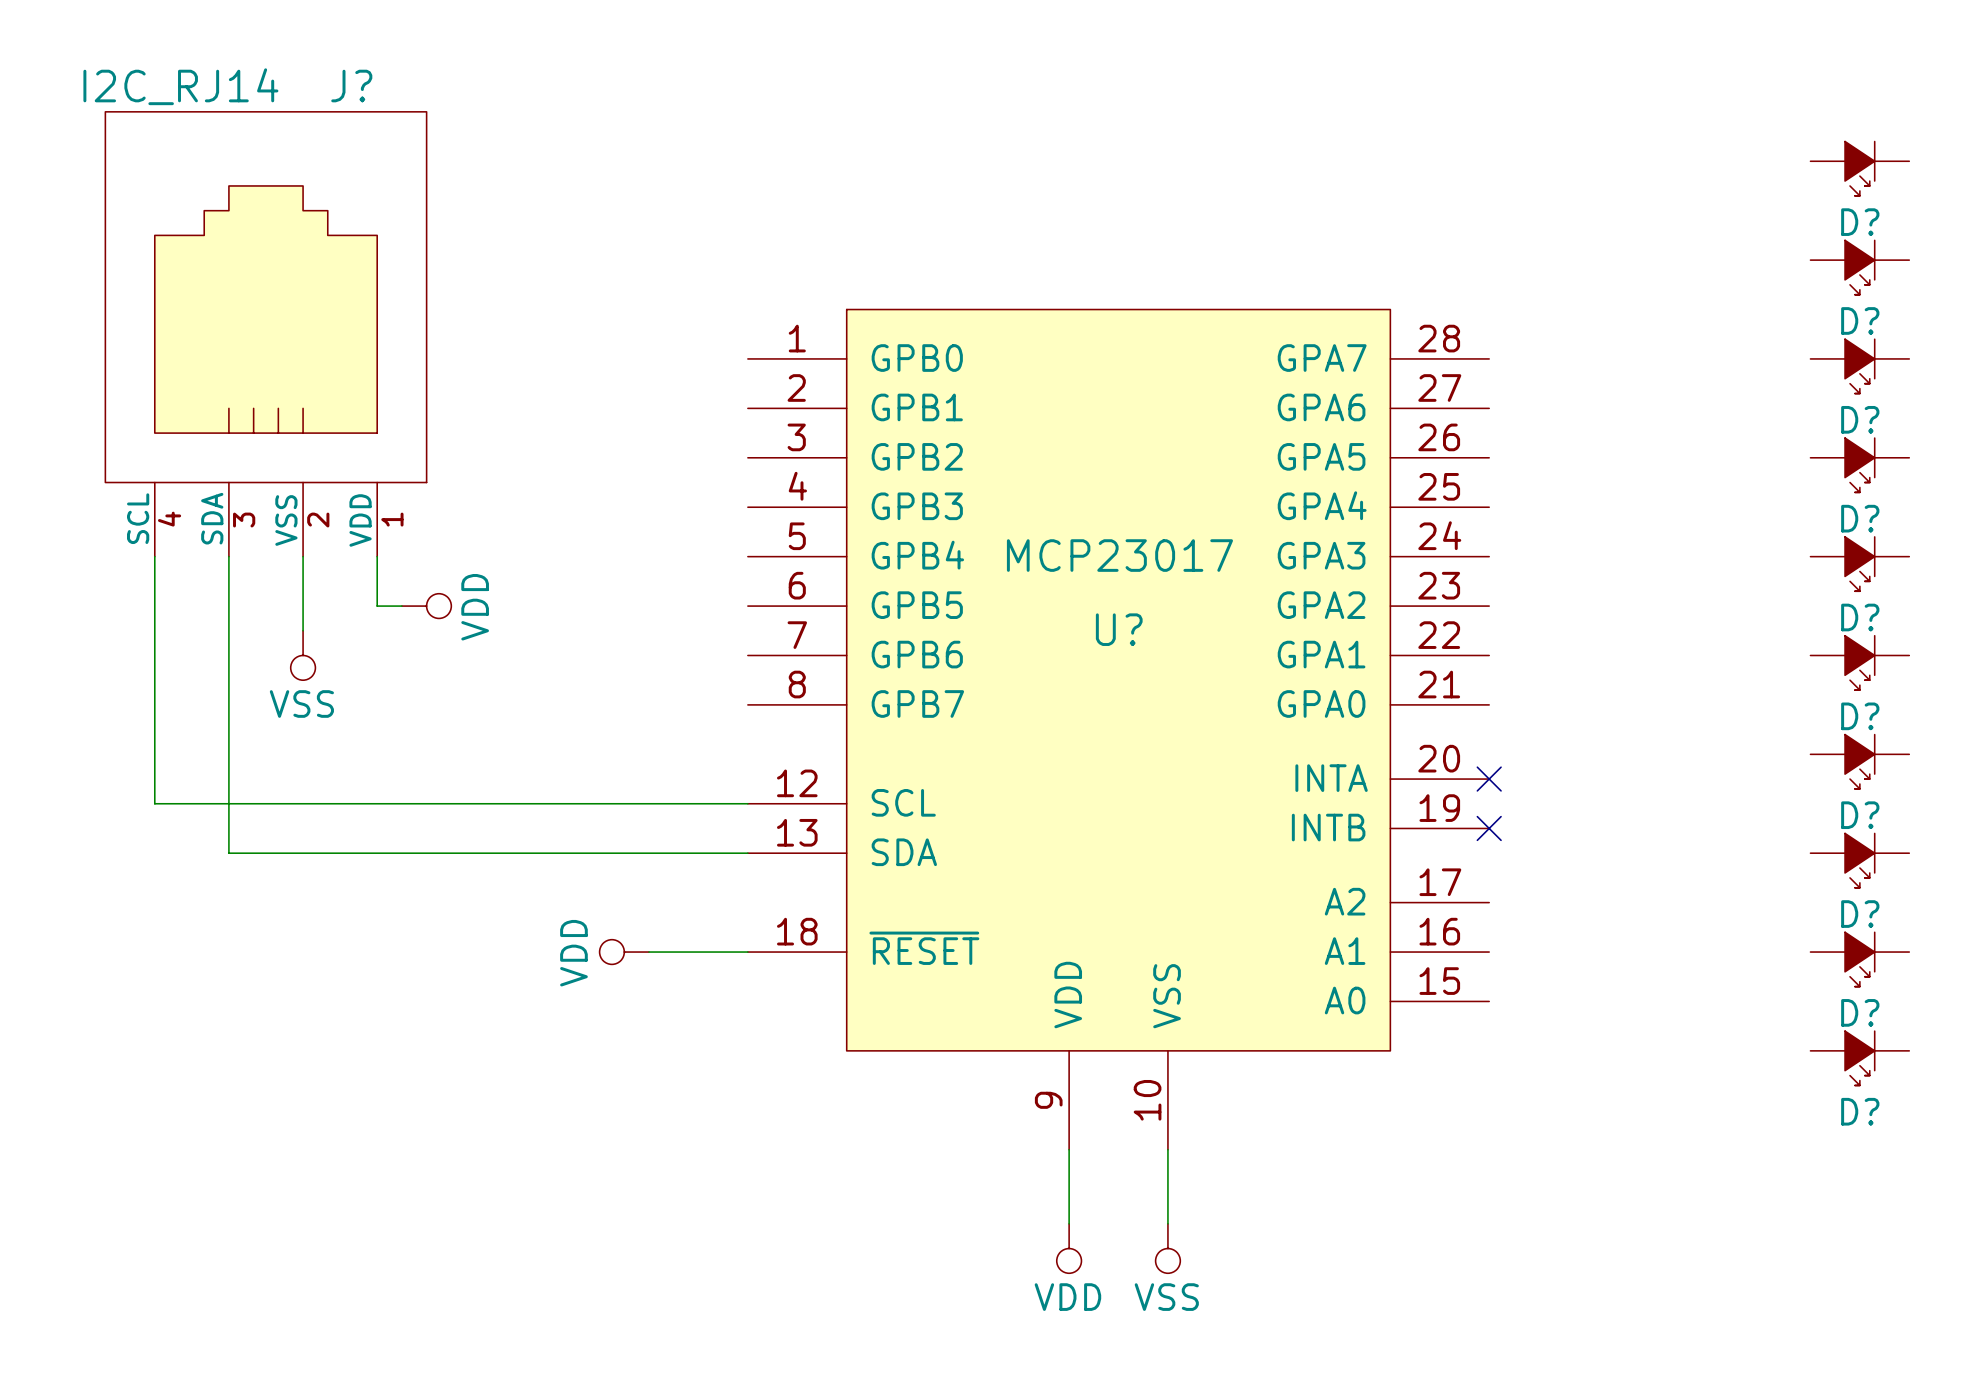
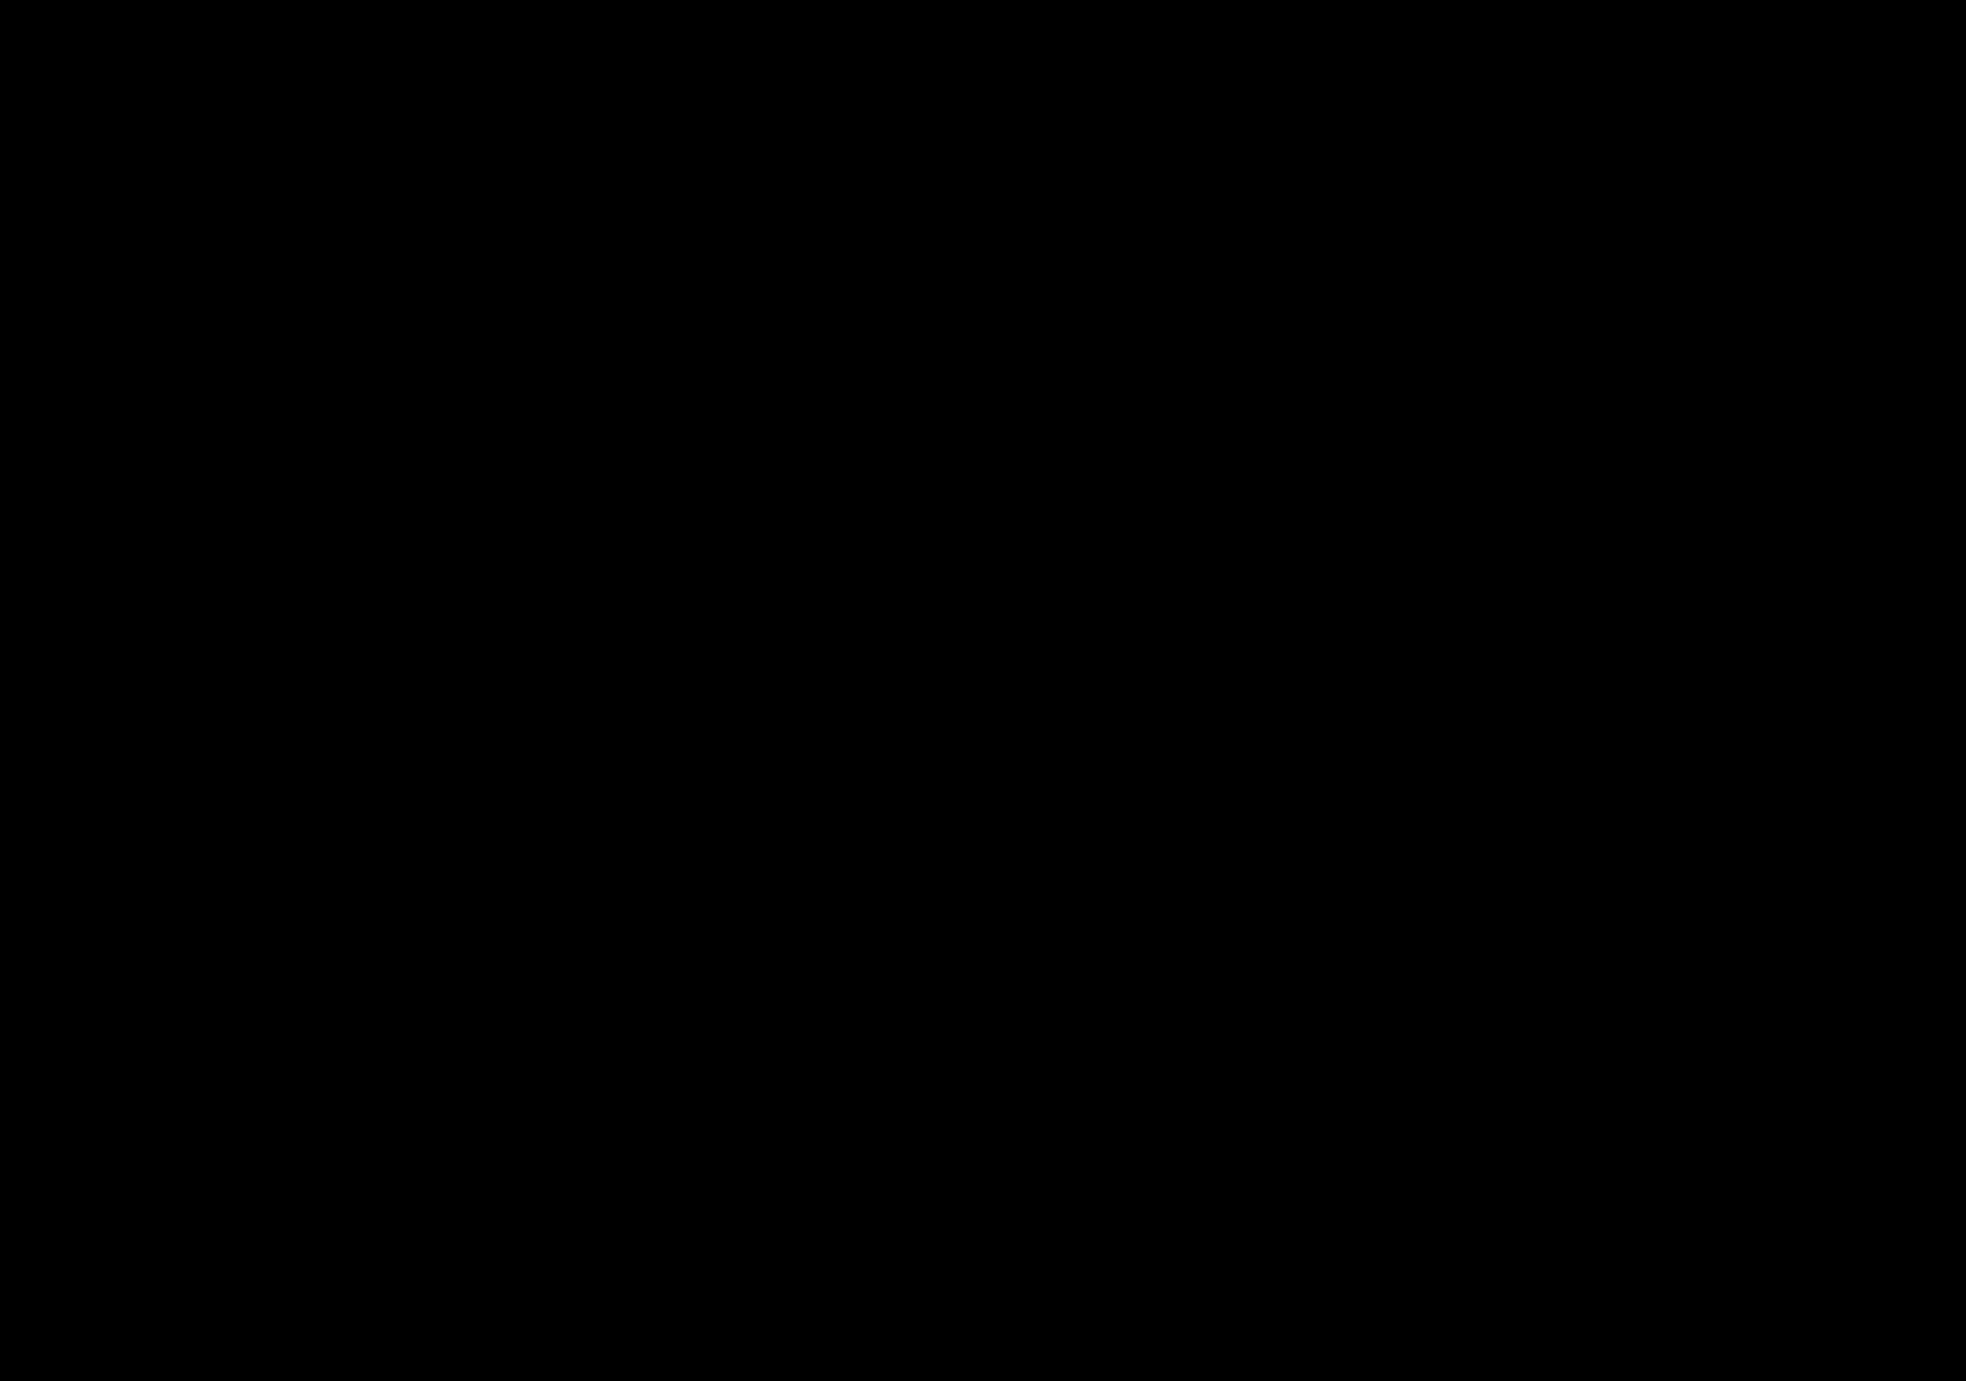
D?: (1859, 168) -> none
D?: (1859, 267) -> none
J?: I2C_RJ14 (265, 334) -> none
D?: (1859, 366) -> none
D?: (1859, 465) -> none
wire: (154, 556) (154, 803) (747, 803) -> none
wire: (228, 556) (228, 853) (747, 853) -> none
wire: (303, 556) (303, 630) -> none
wire: (377, 556) (377, 606) (401, 606) -> none
D?: (1859, 564) -> none
power symbol: VDD (426, 606) -> none
power symbol: VSS (303, 655) -> none
D?: (1859, 662) -> none
U?: MCP23017 (1118, 729) -> none
D?: (1859, 761) -> none
no-connect mark: (1489, 779) -> none
no-connect mark: (1489, 828) -> none
D?: (1859, 860) -> none
power symbol: VDD (624, 952) -> none
wire: (649, 952) (747, 952) -> none
D?: (1859, 959) -> none
D?: (1859, 1058) -> none
wire: (1069, 1149) (1069, 1223) -> none
wire: (1167, 1149) (1167, 1223) -> none
power symbol: VDD (1069, 1248) -> none
power symbol: VSS (1167, 1248) -> none

